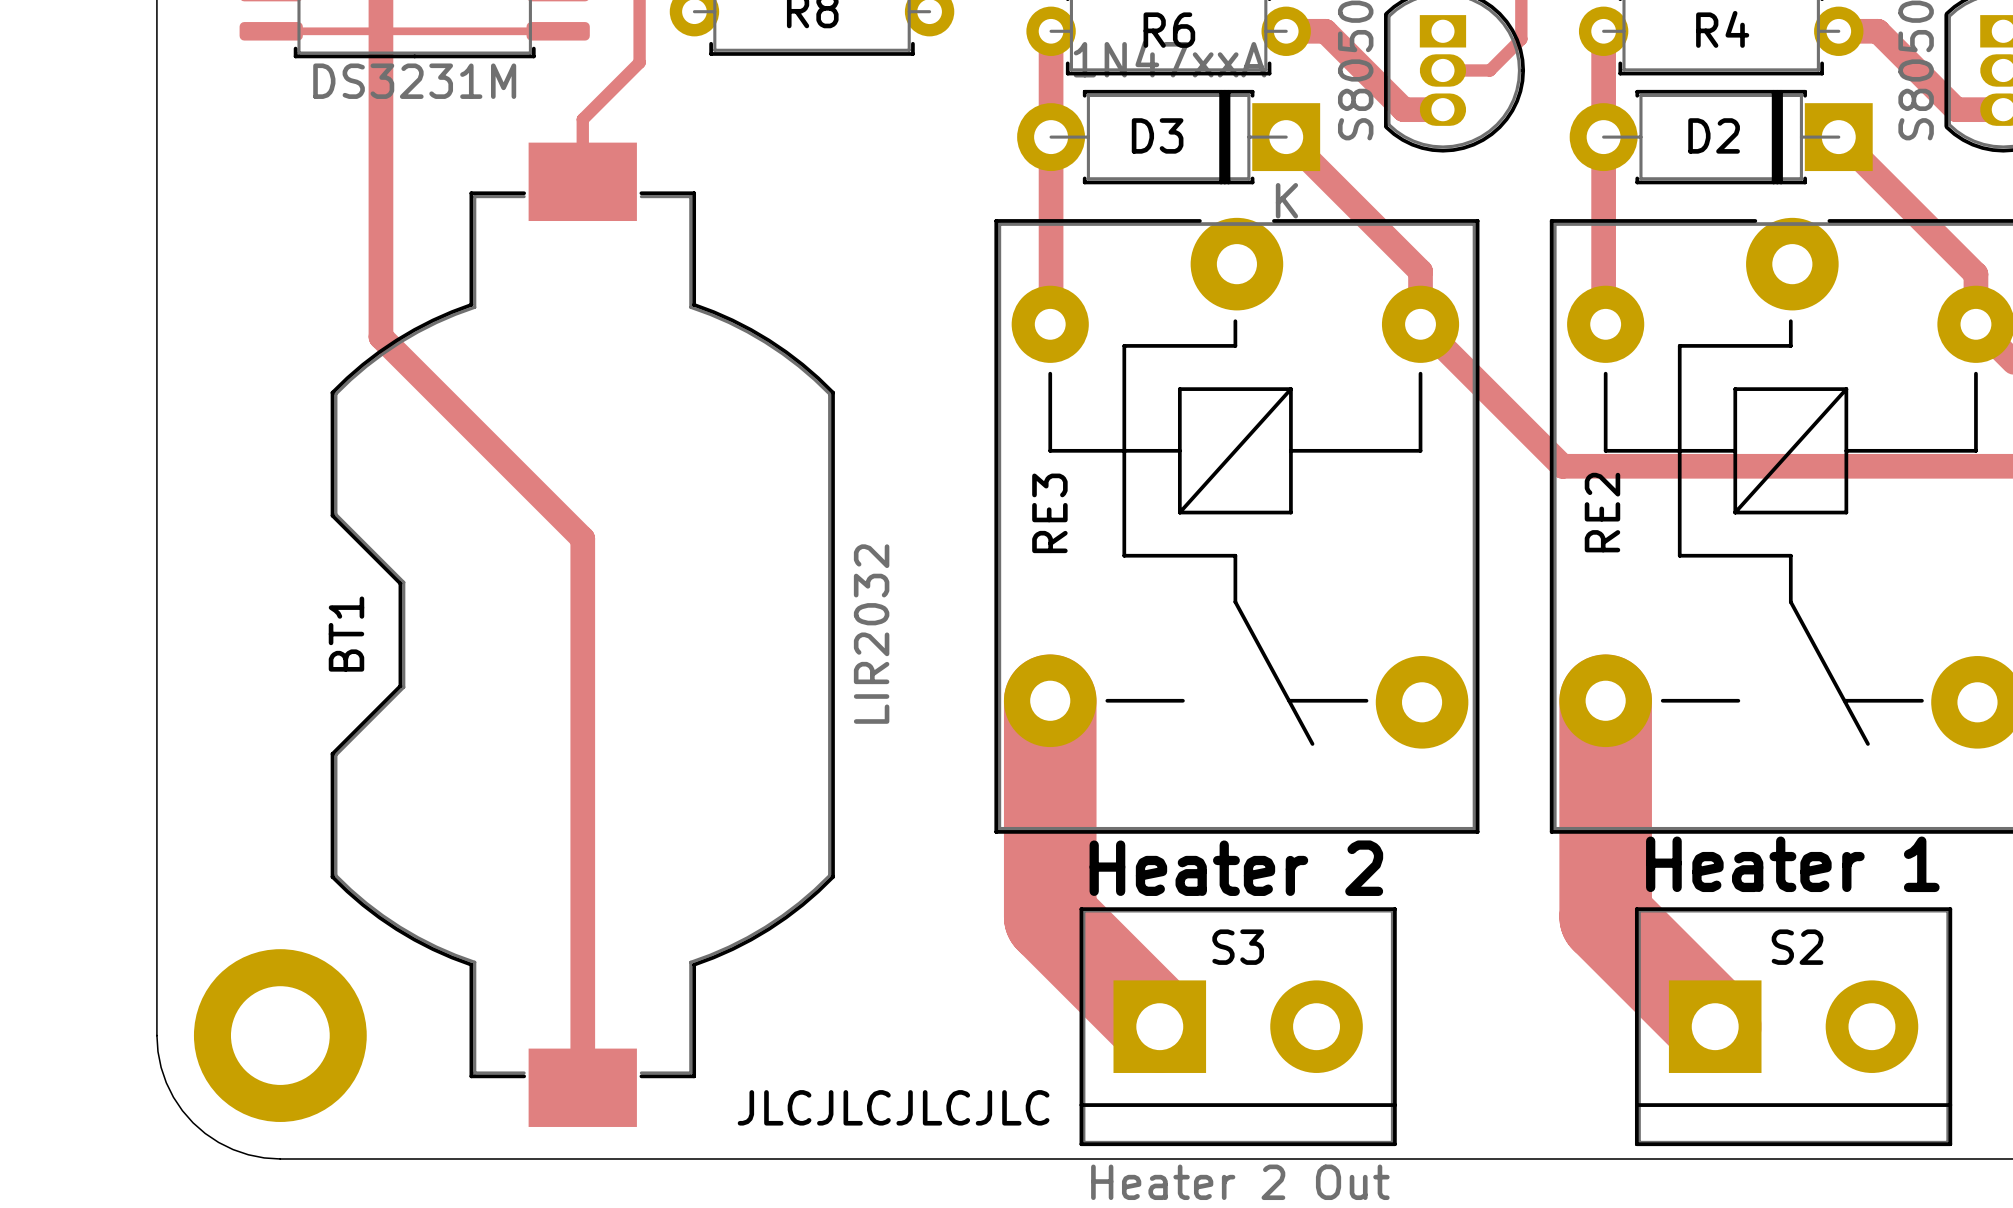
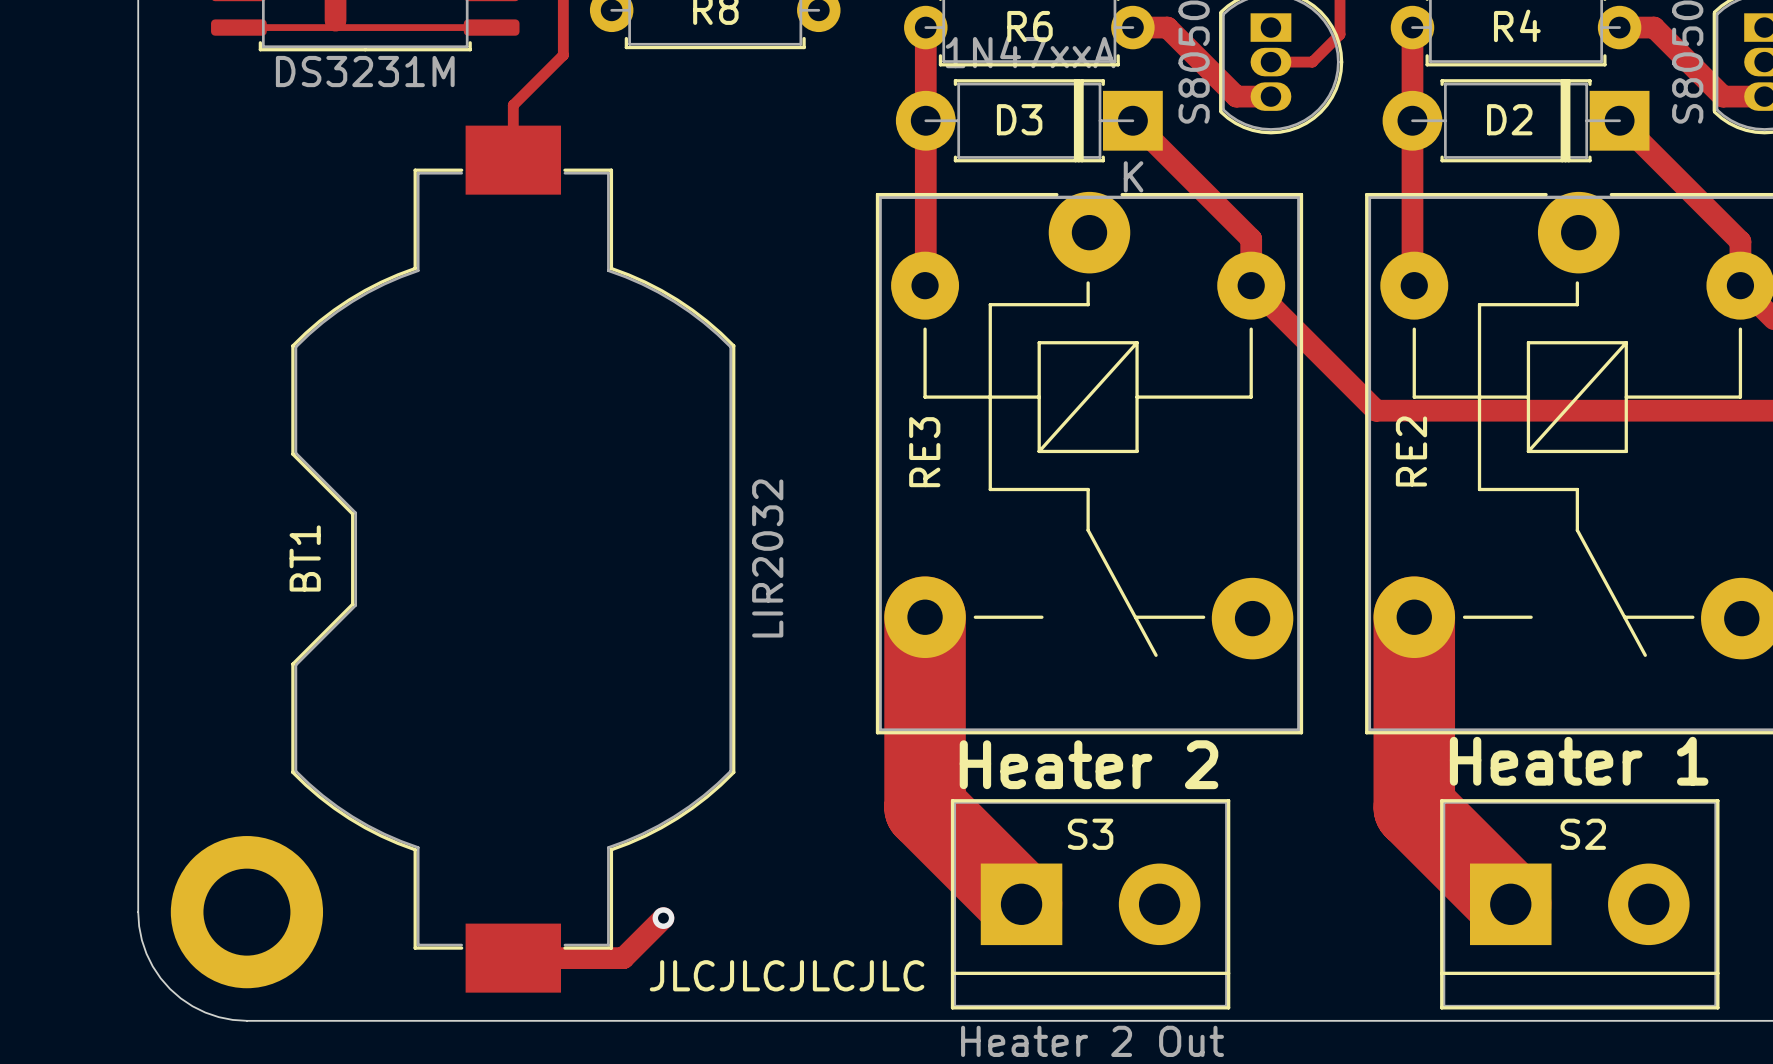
track: (380, 23) (380, 336) (582, 538) (582, 1087) -> (663, 918) (623, 958) (513, 958)
via: none -> (663, 918)

